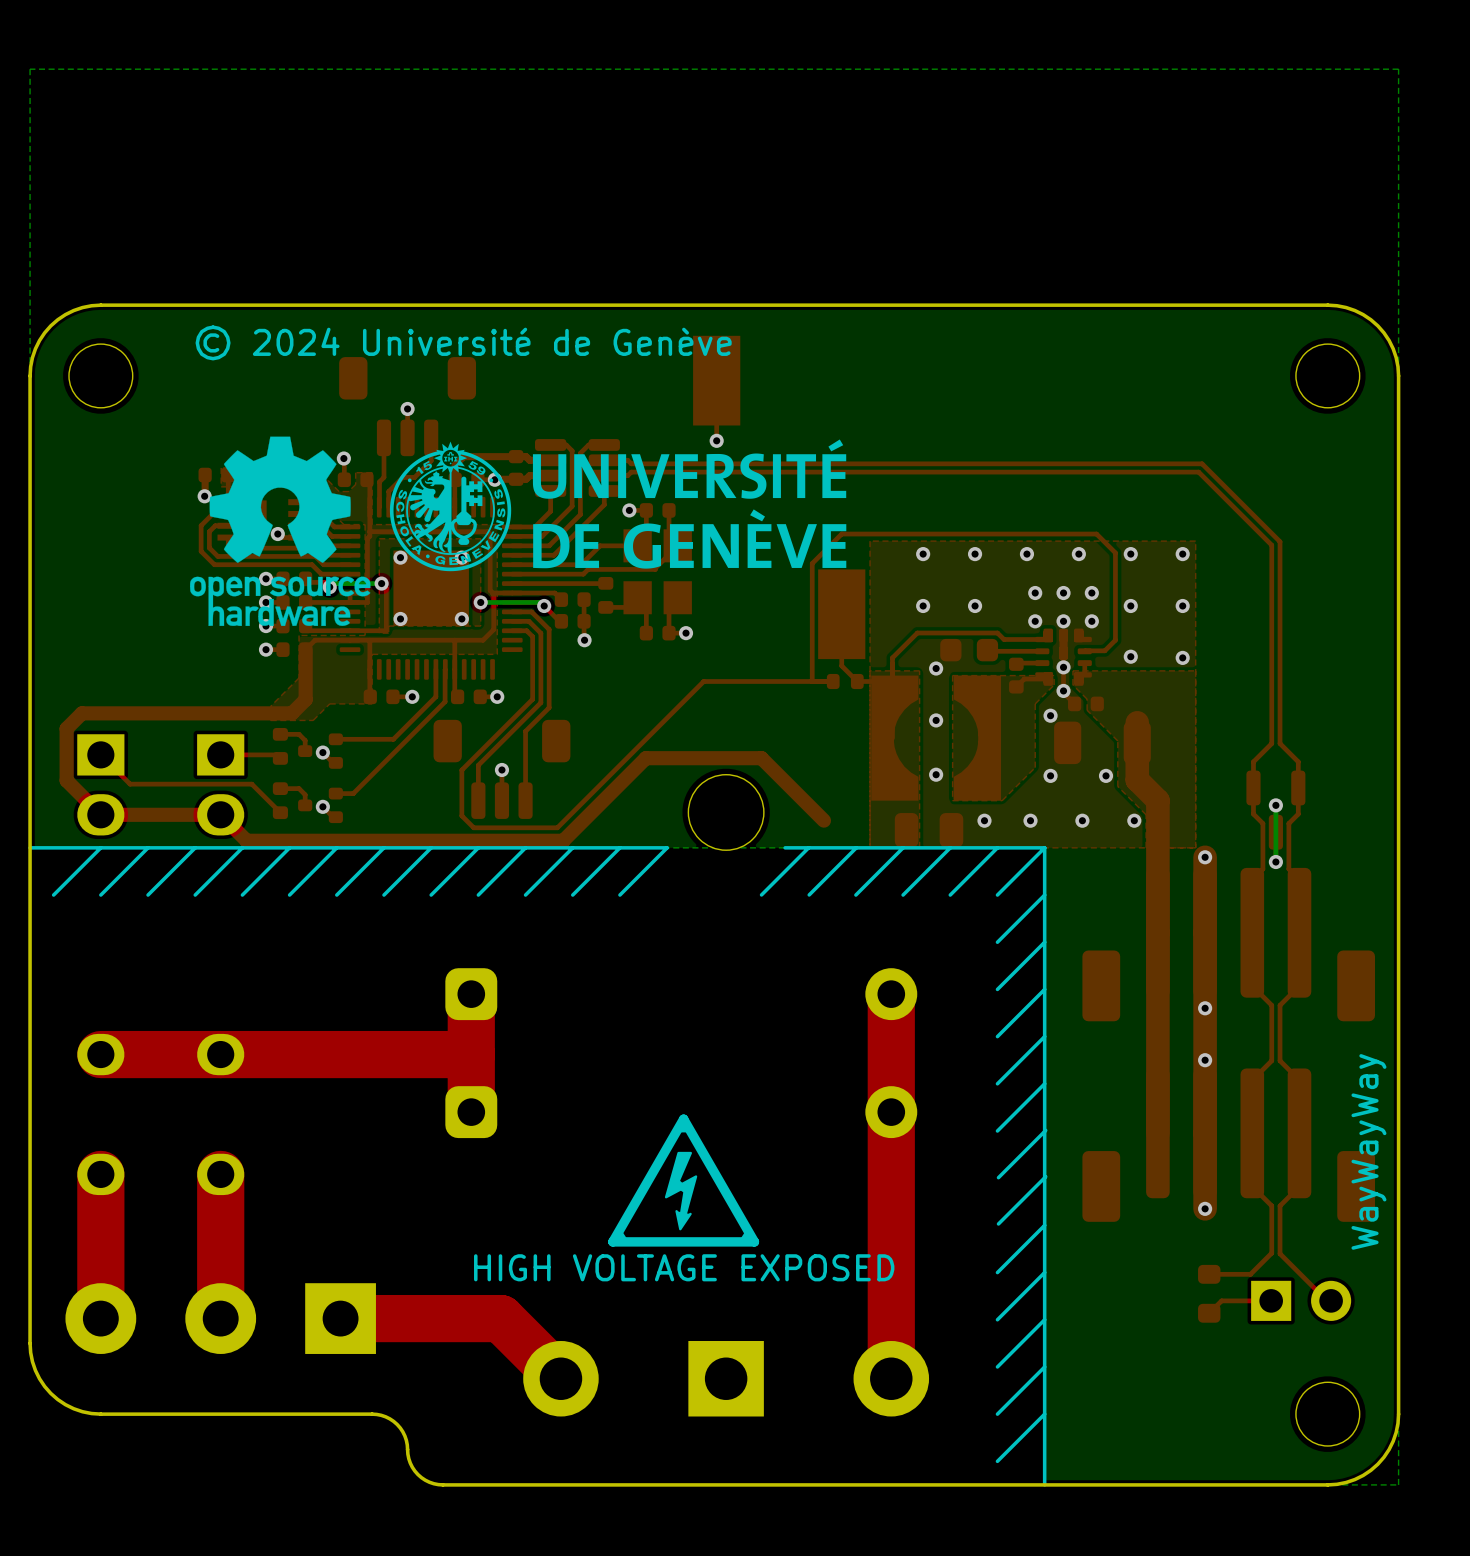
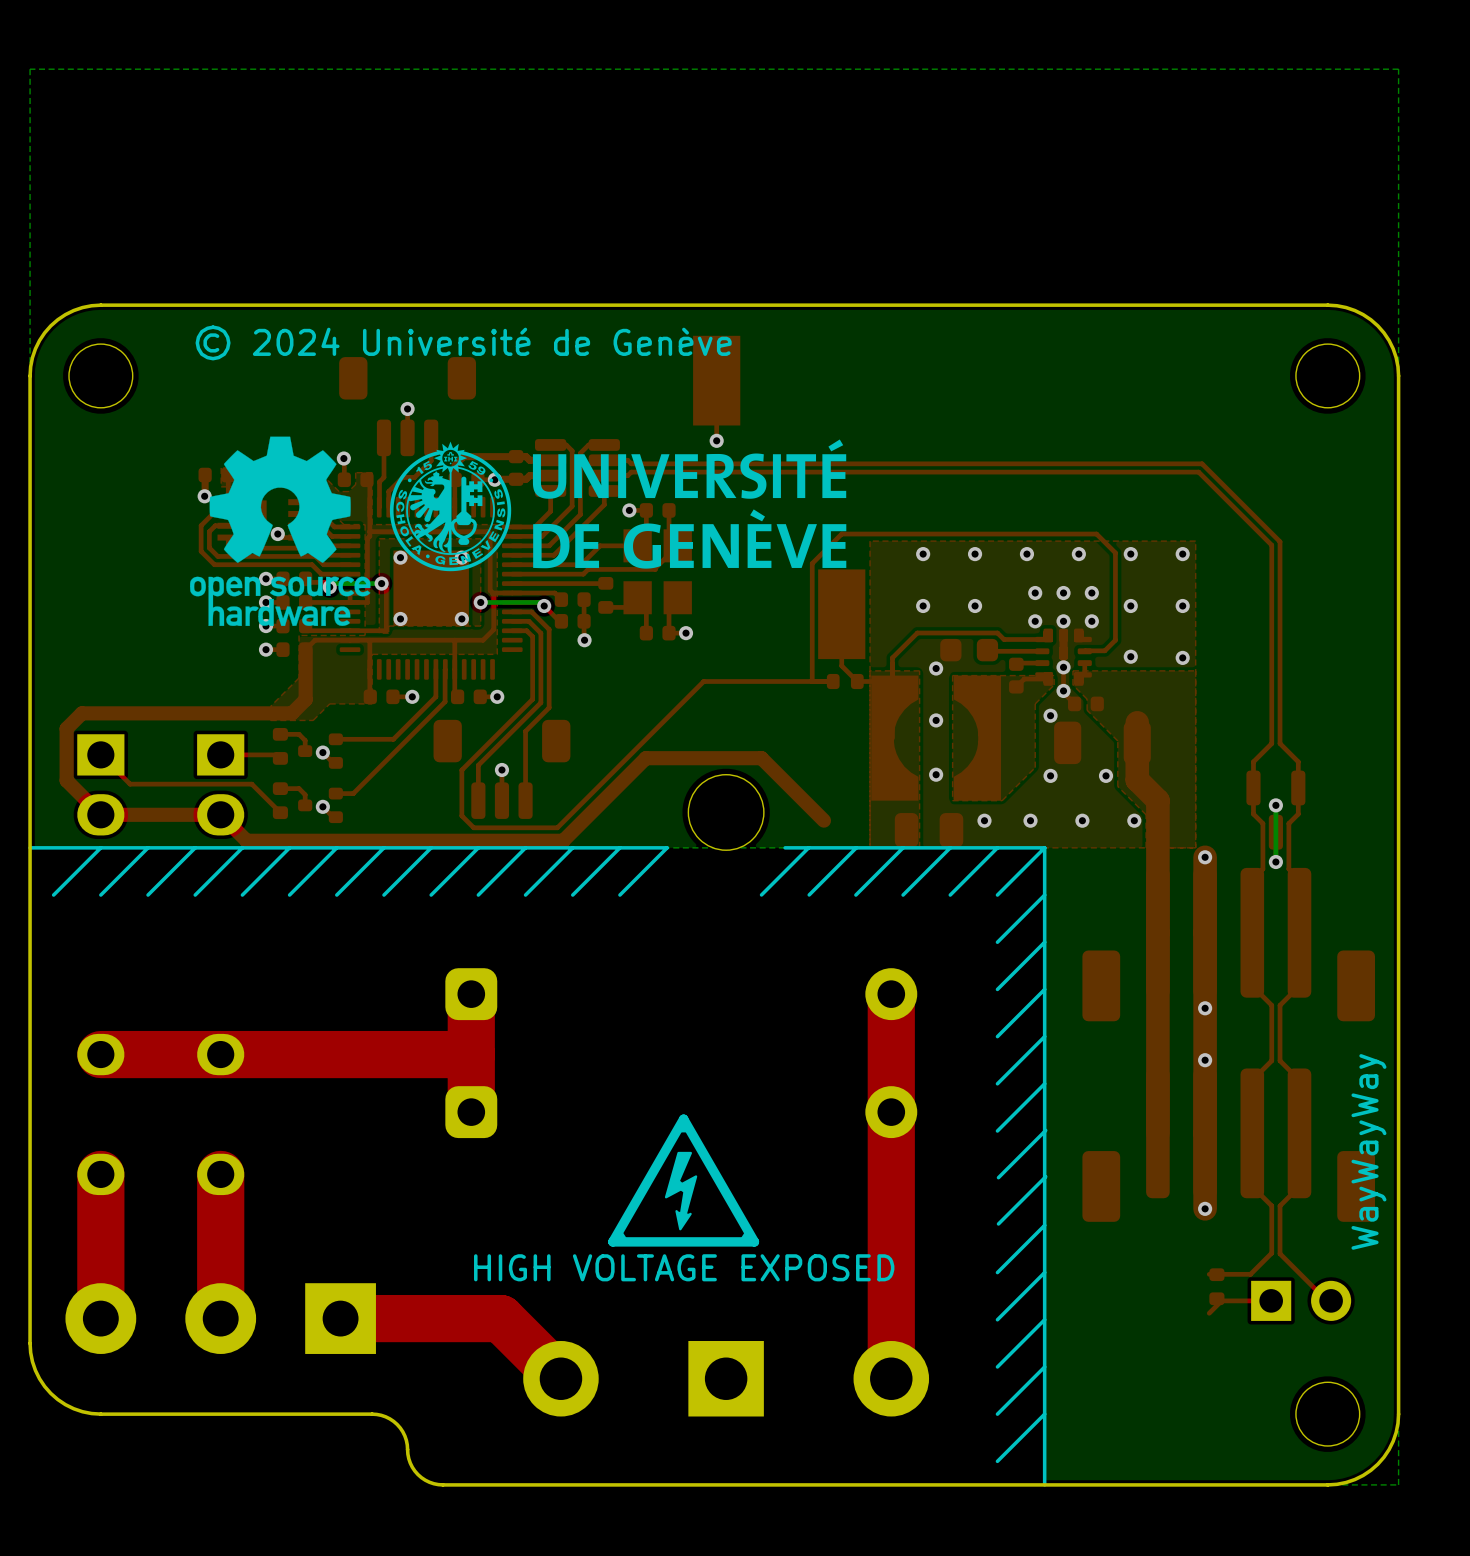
part footprint: [1198, 1264, 1221, 1323] -> [1209, 1268, 1225, 1306]

